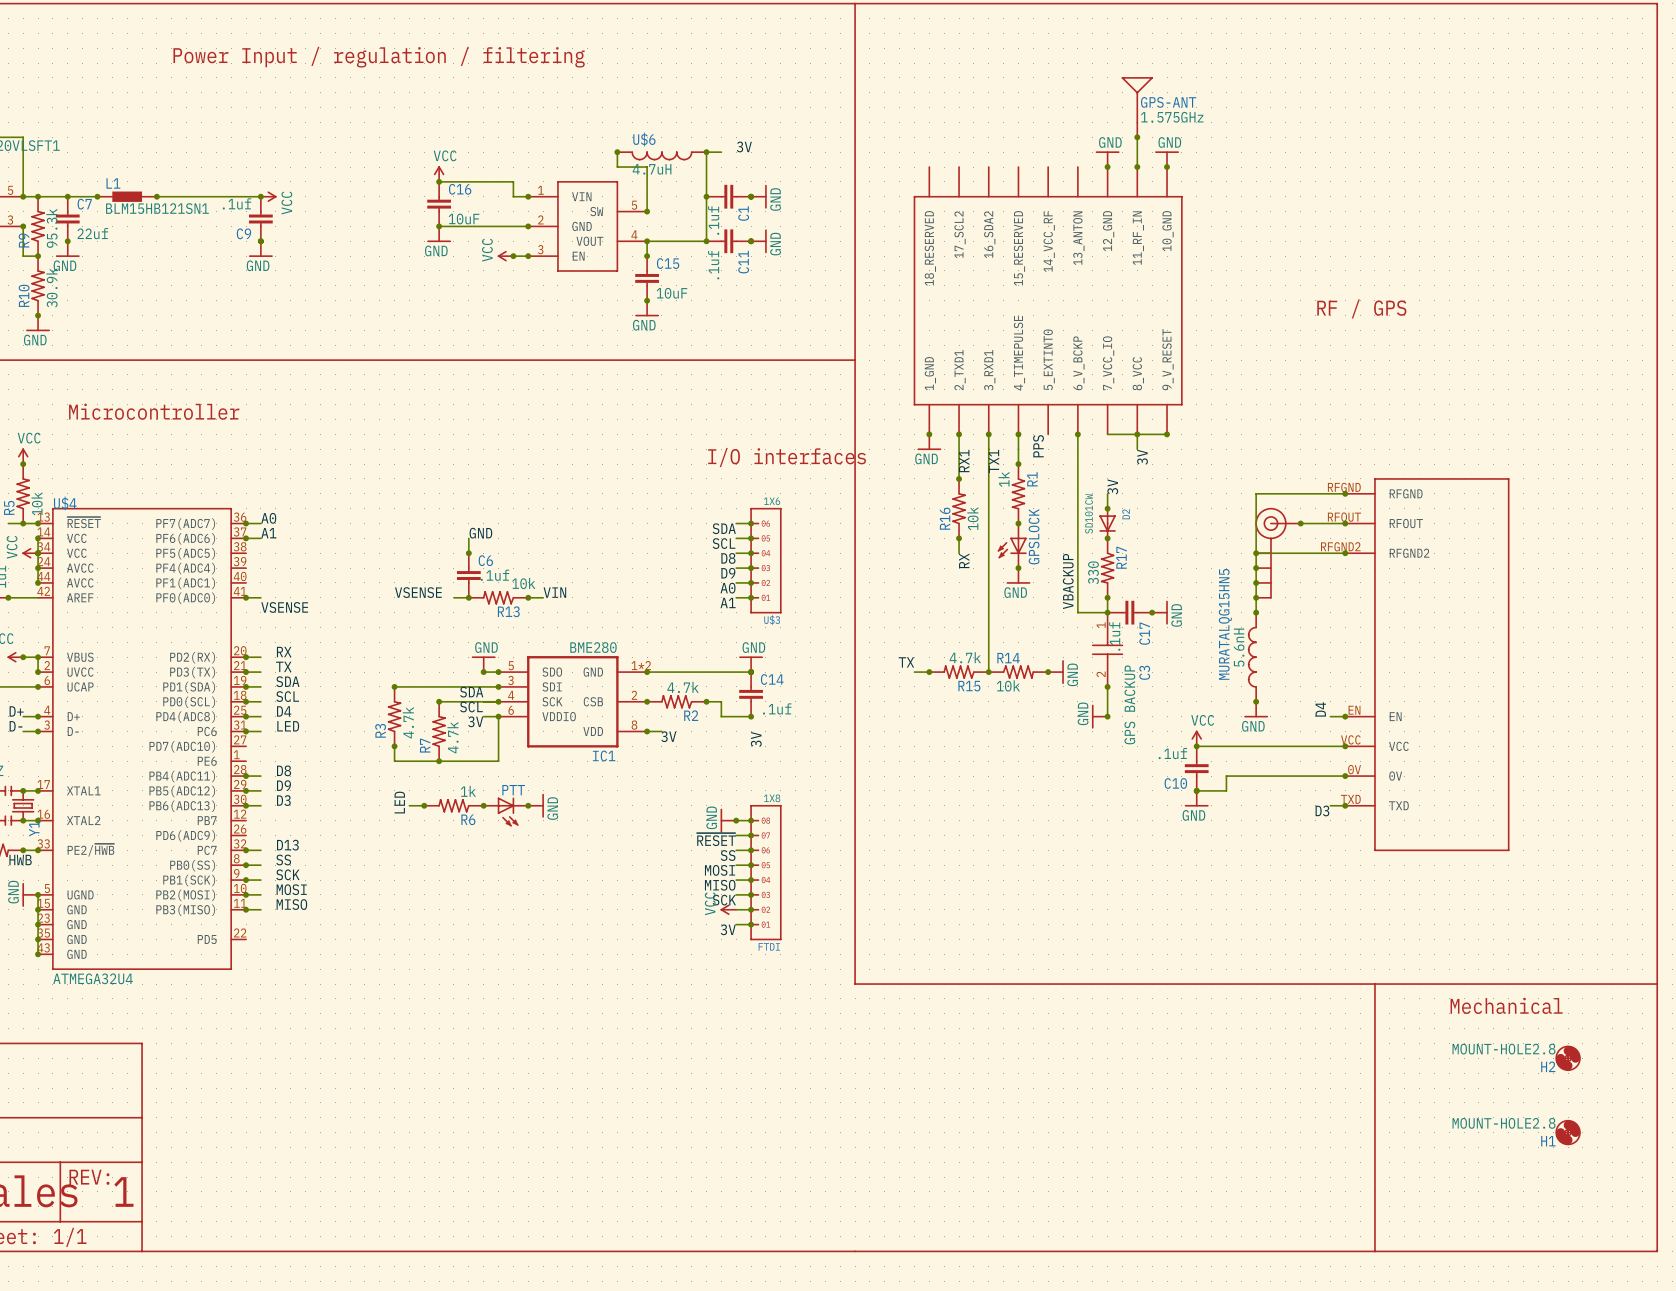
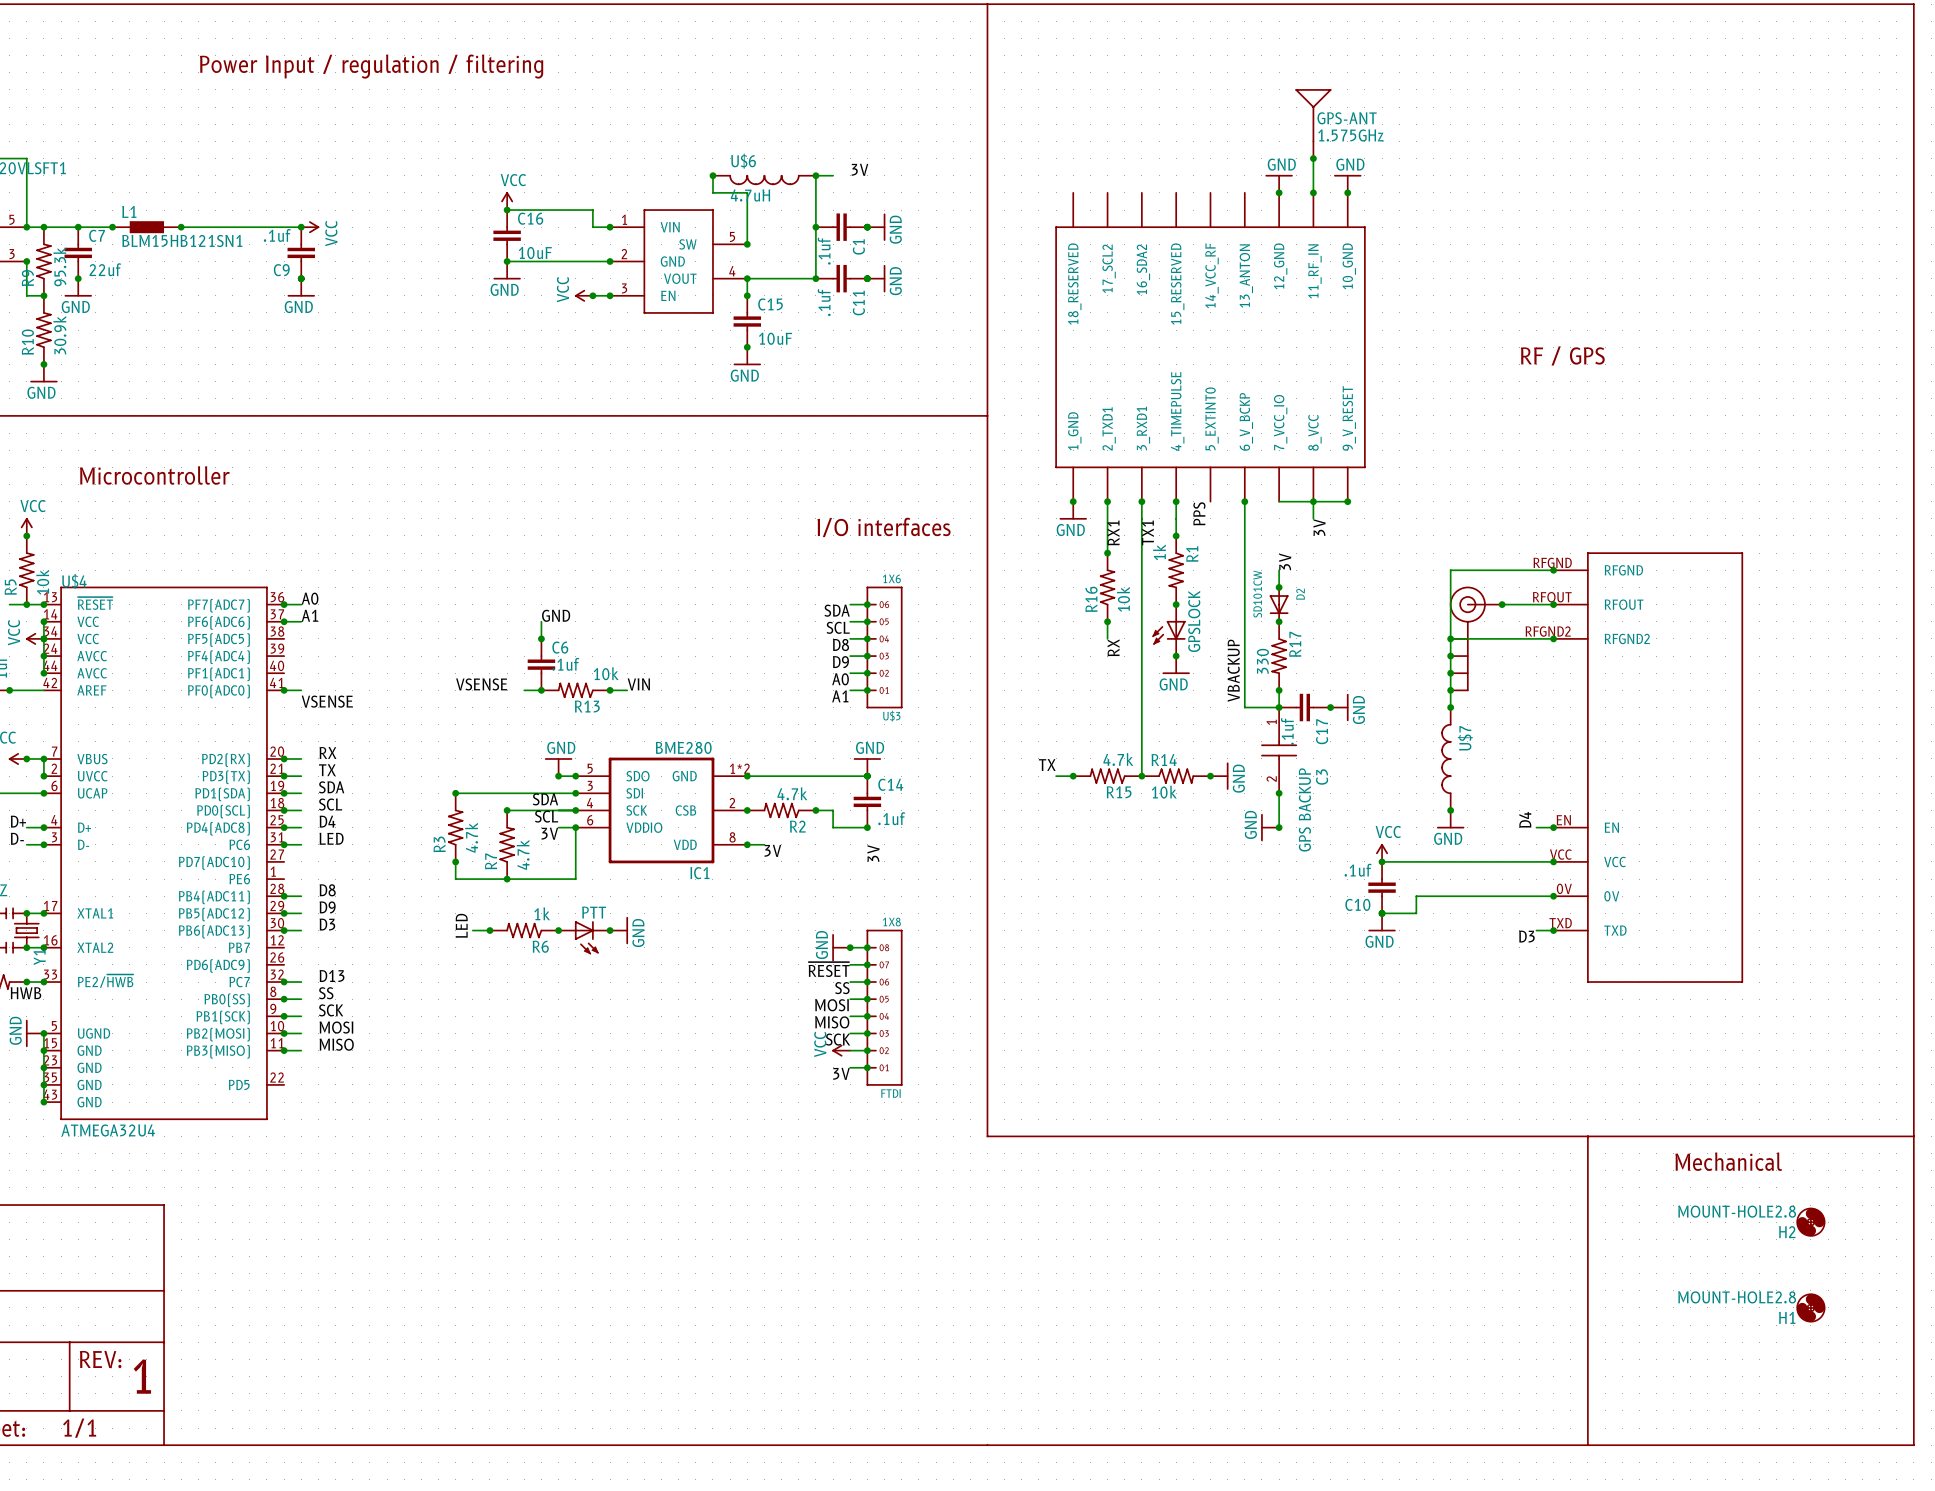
MURATALQG15HN5 name: MURATALQG15HN5 (1225, 624) -> U$7 (1465, 738)
MURATALQG15HN5 value: 5.6nH (1239, 647) -> none

